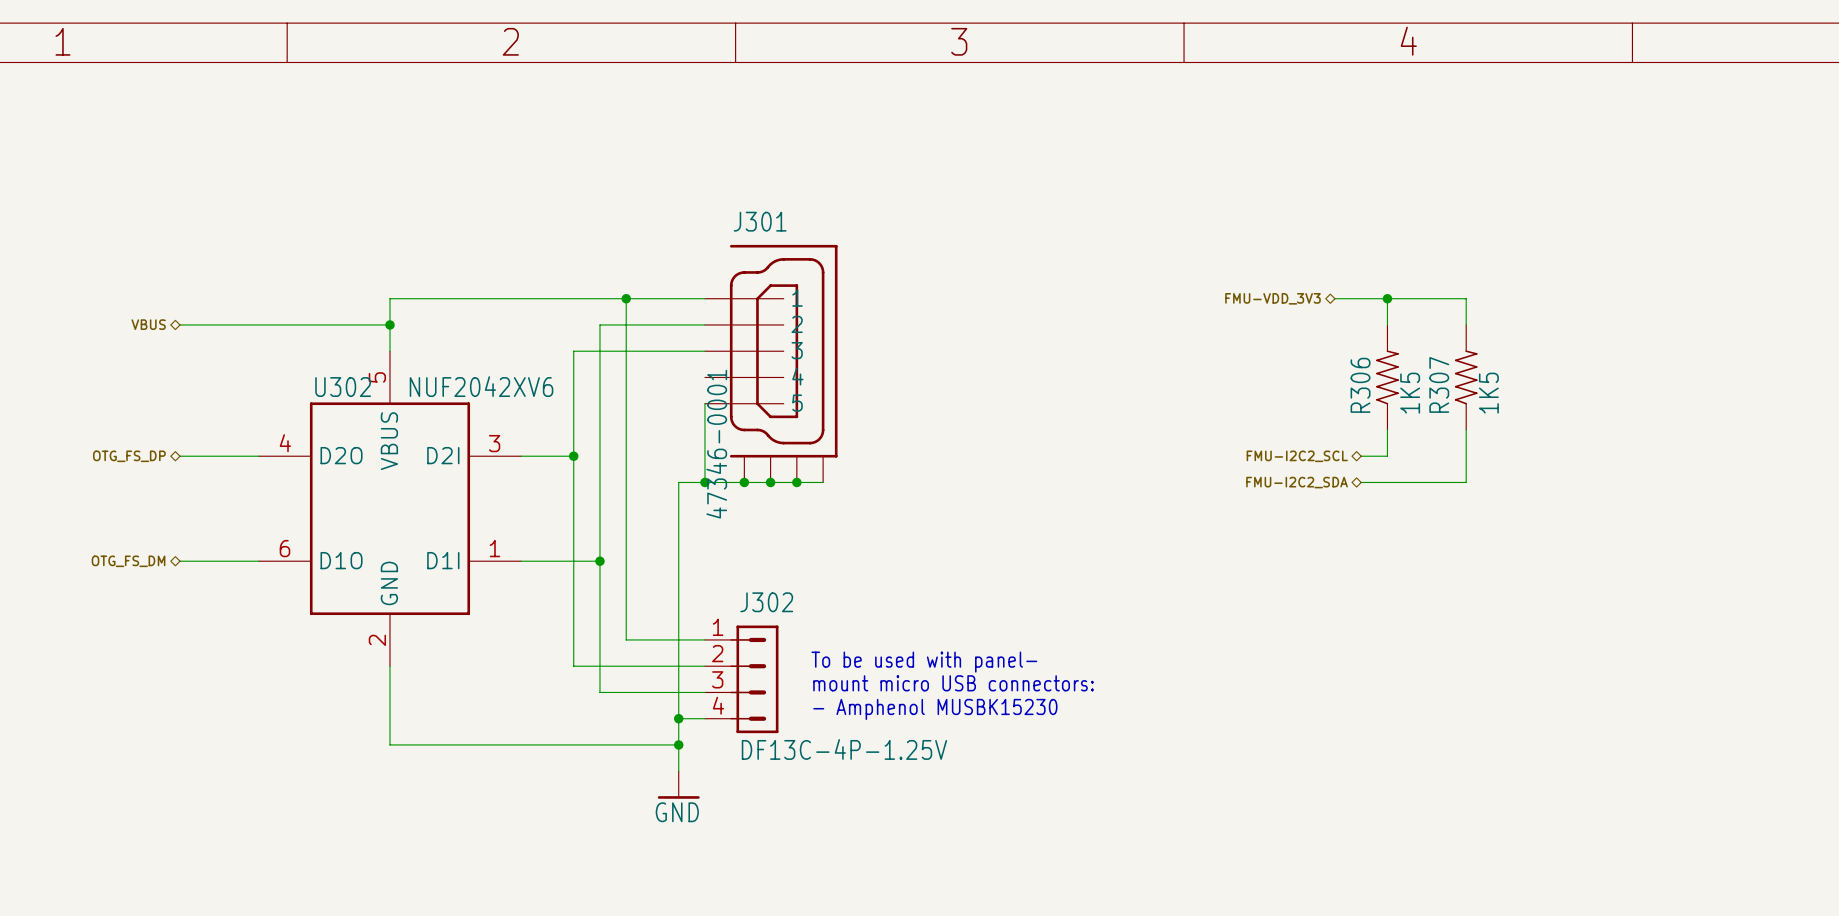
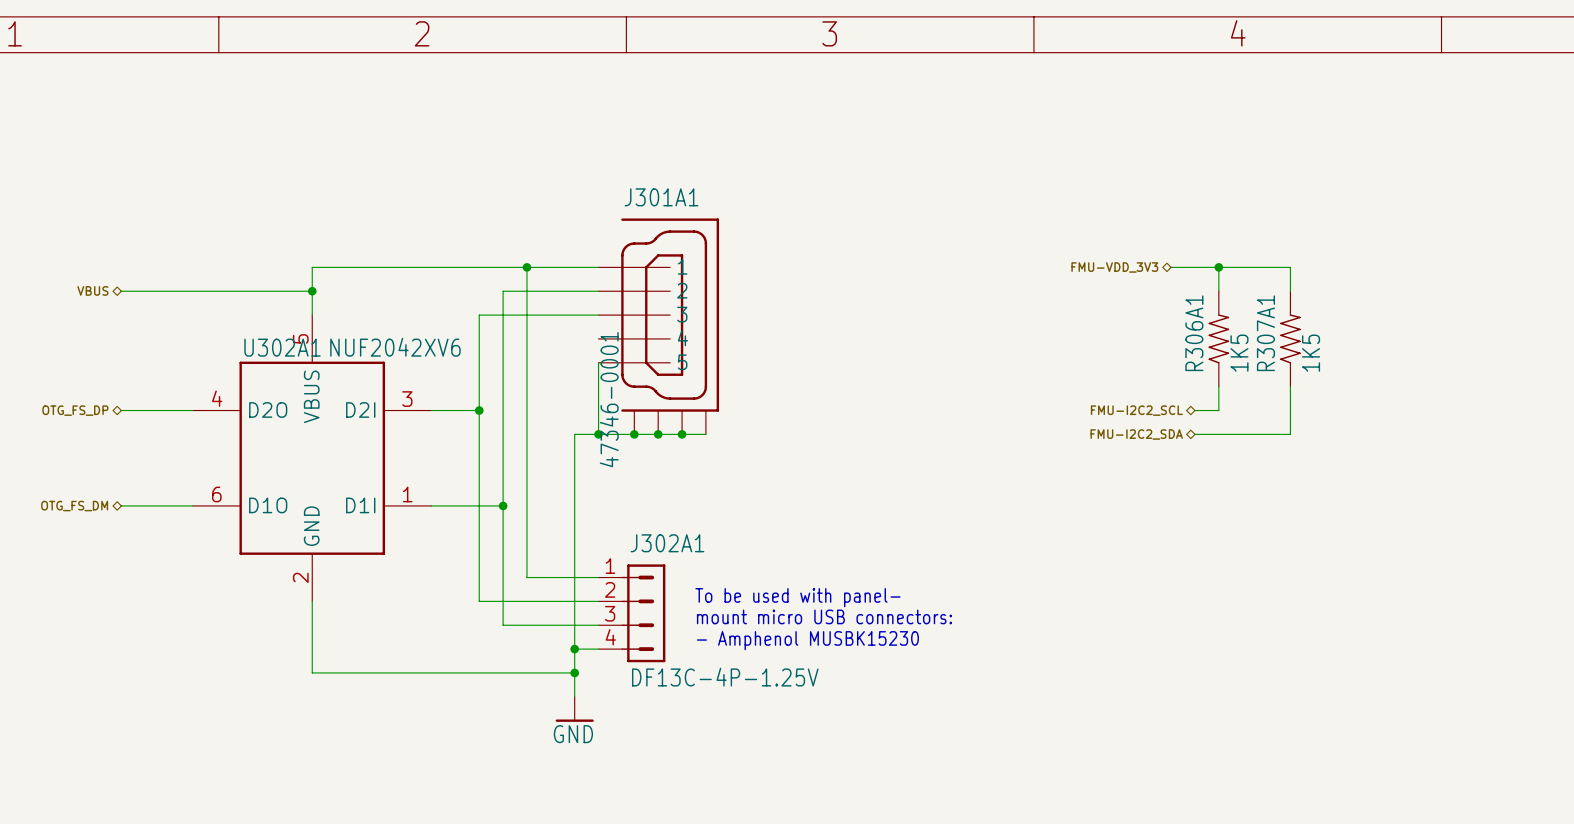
J301 name: J301 (760, 221) -> J301A1 (661, 197)
R307 name: R307 (1439, 384) -> R307A1 (1265, 333)
R306 name: R306 (1360, 385) -> R306A1 (1194, 333)
U302 name: U302 (343, 387) -> U302A1 (282, 347)
J302 name: J302 (766, 602) -> J302A1 (667, 543)

